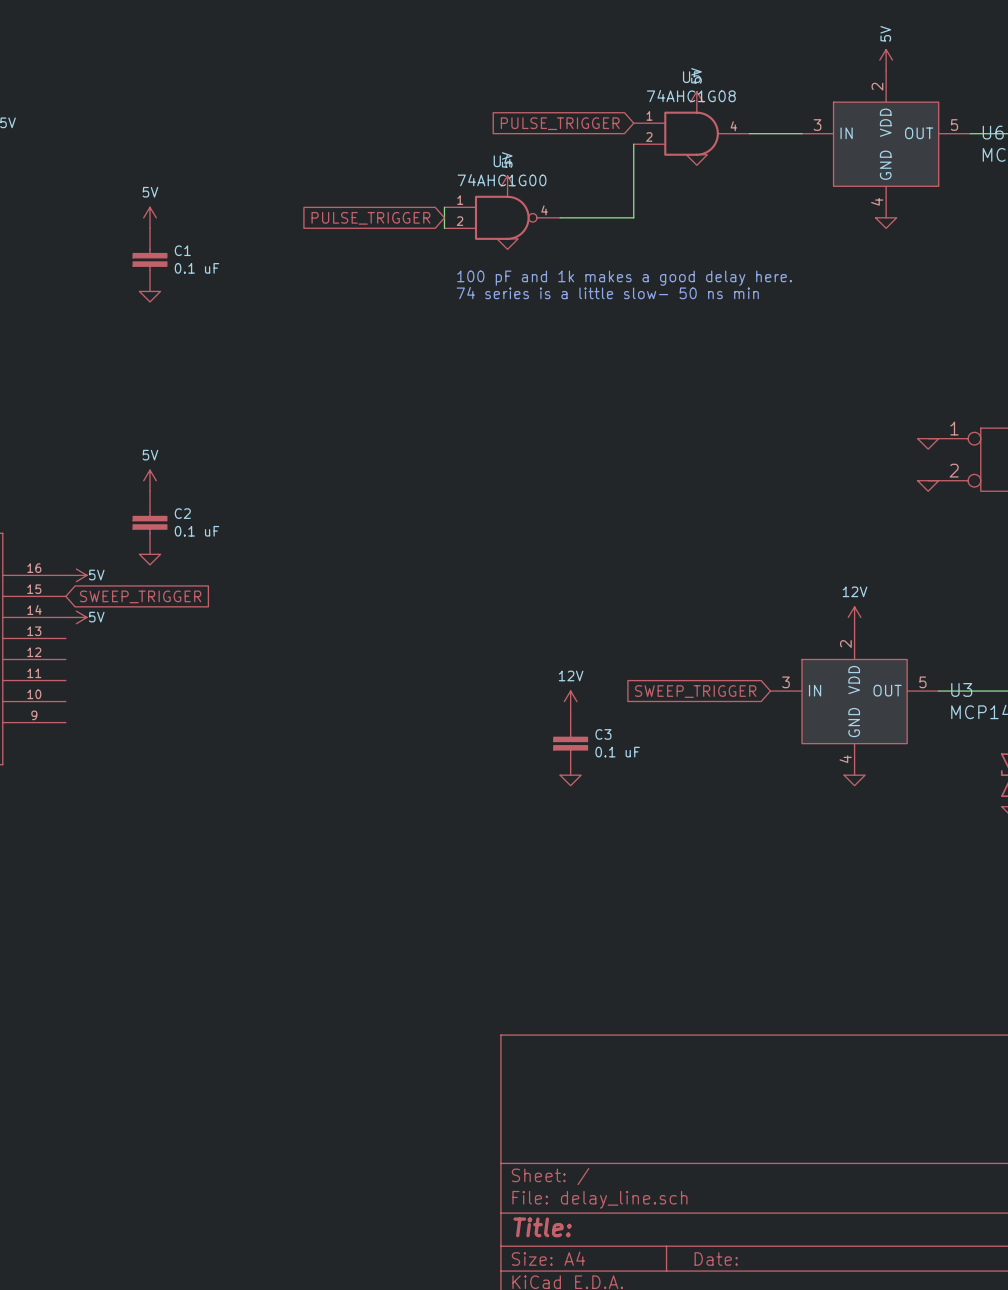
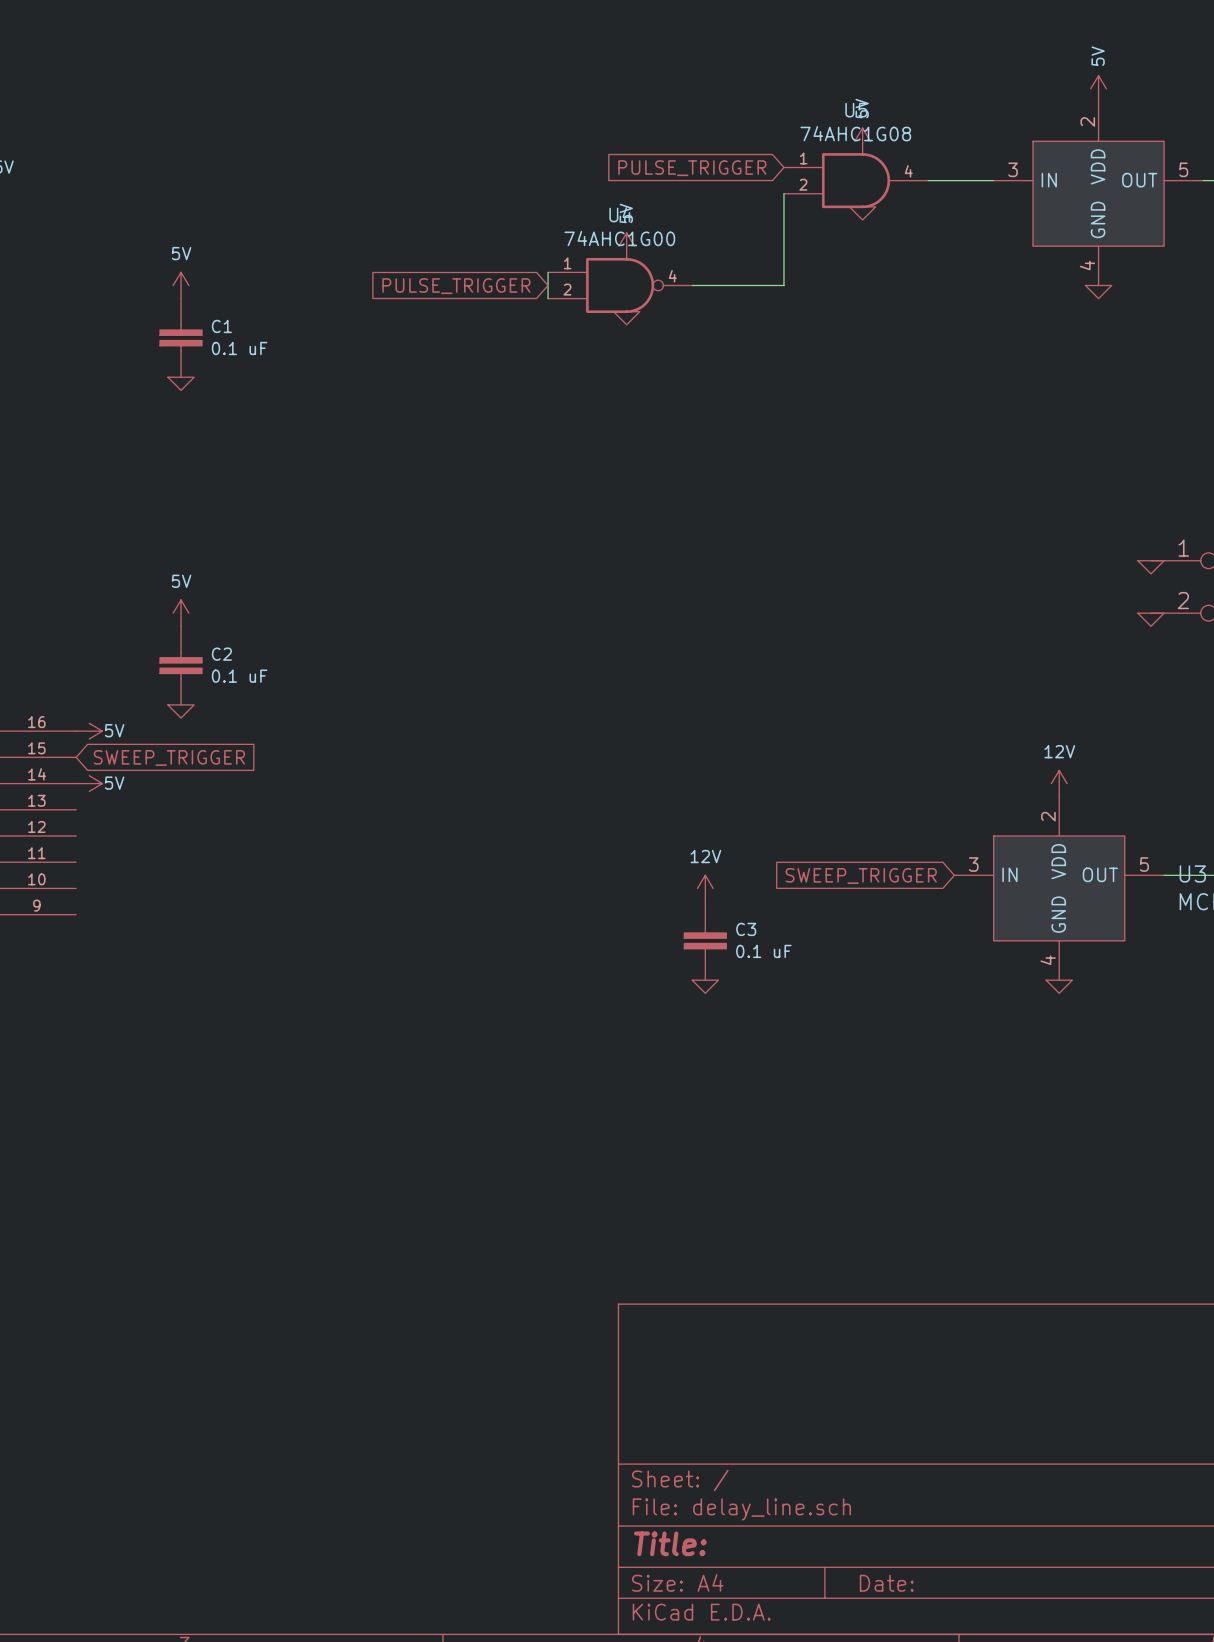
text: 100 pF and 1k makes a good delay here. (624, 278) -> none
text: 74 series is a little slow- 50 ns min (607, 293) -> none

